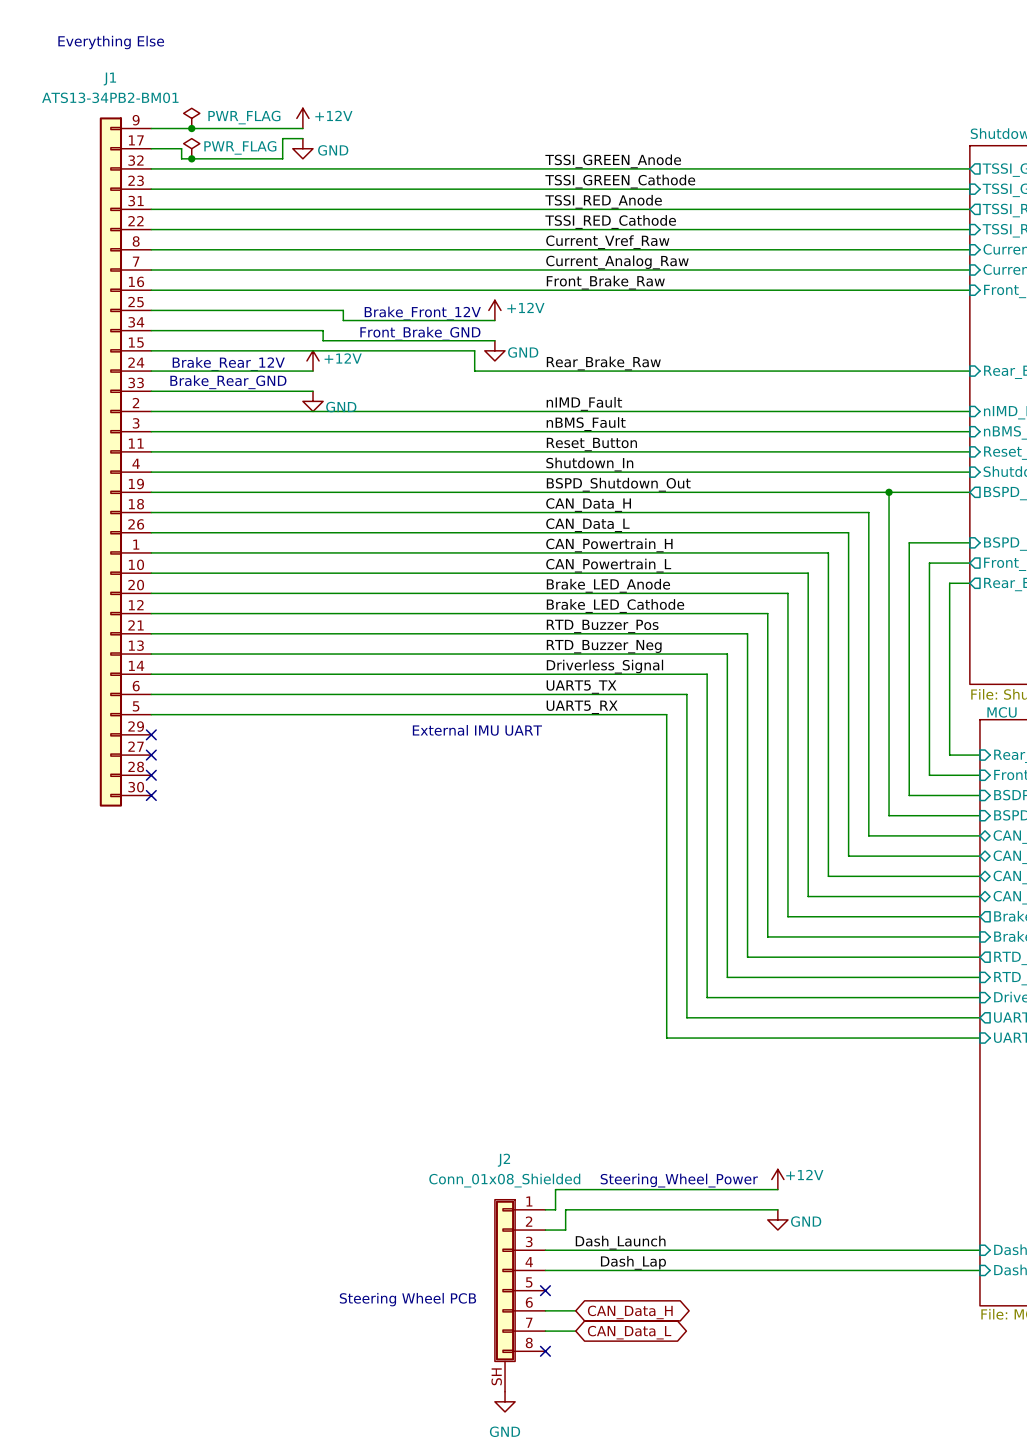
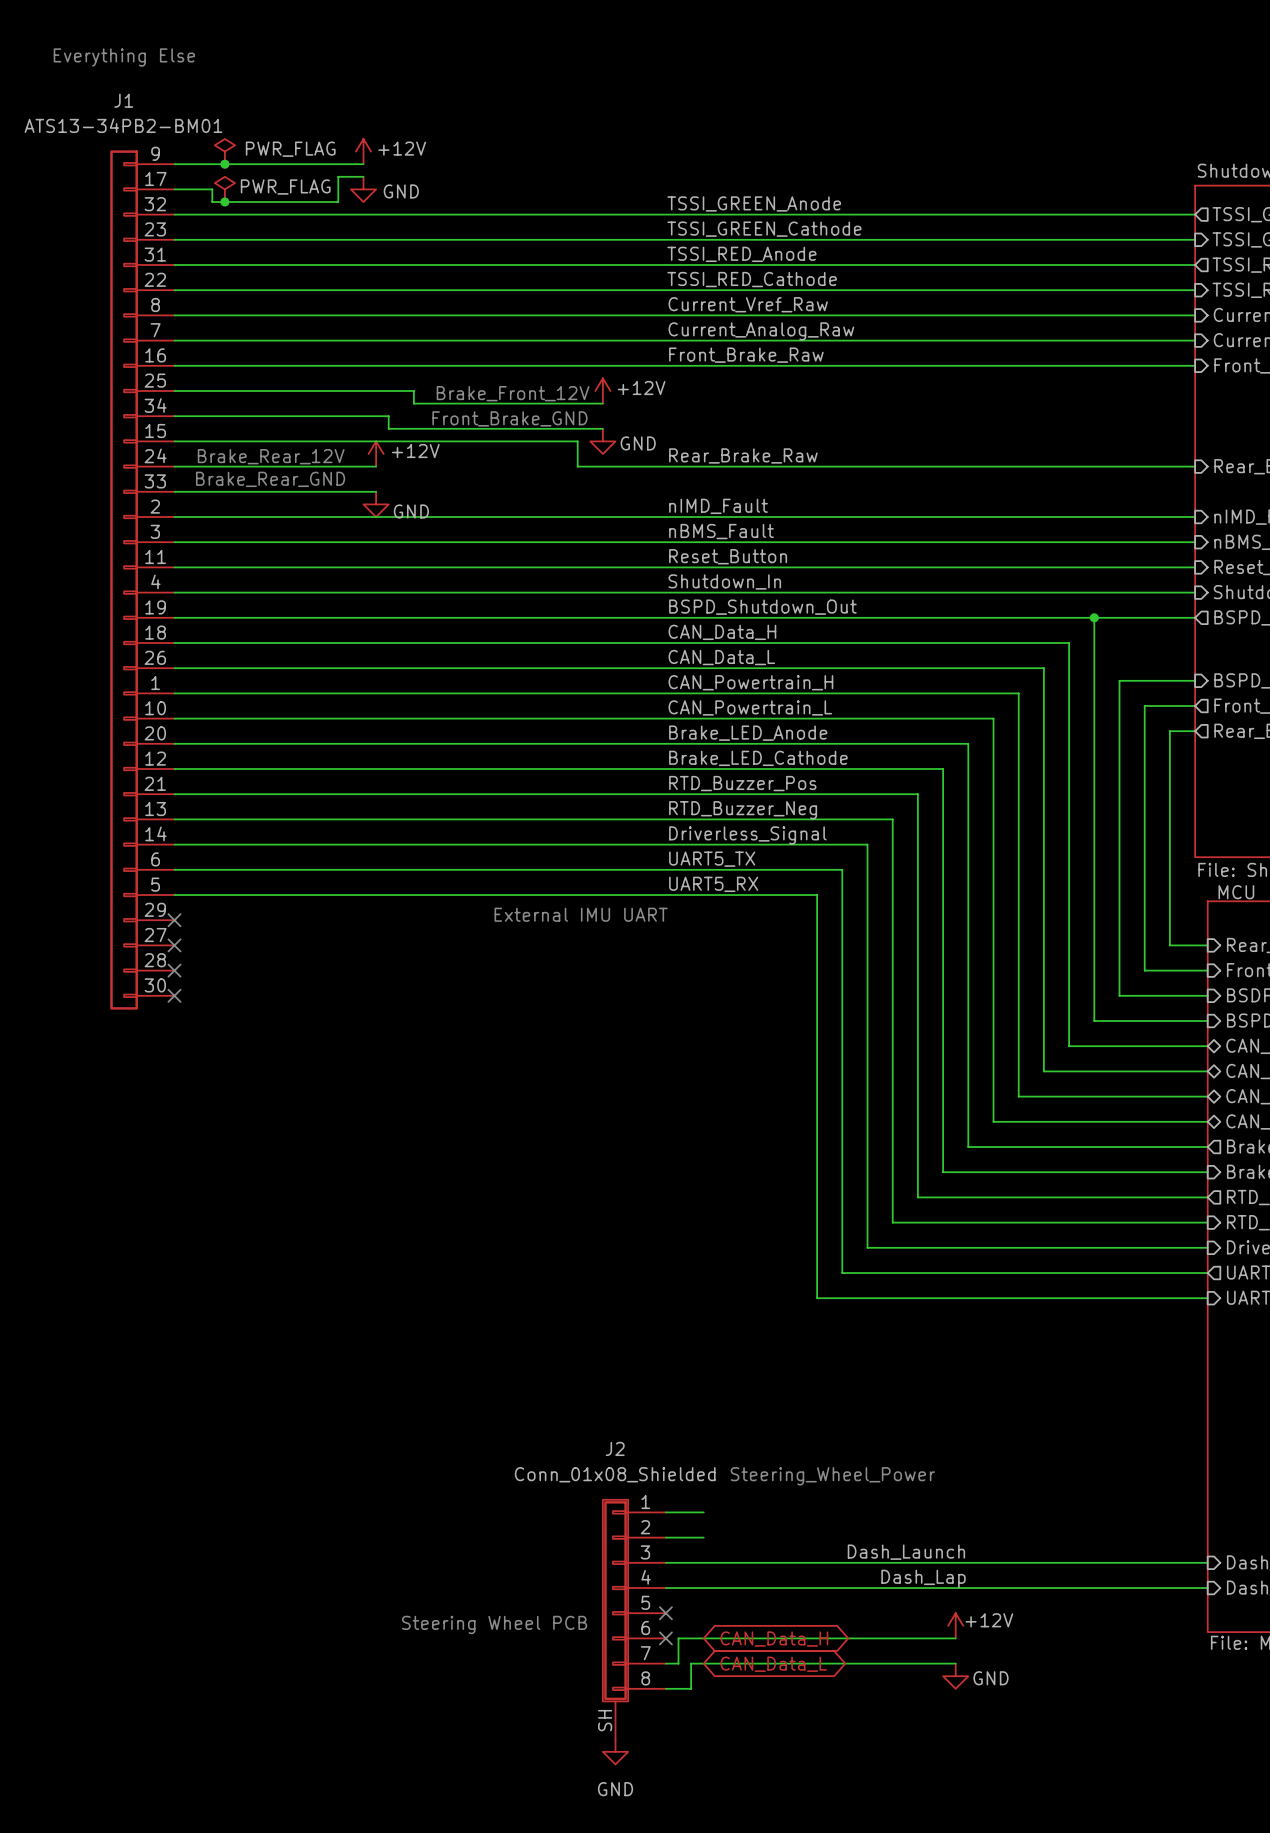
power symbol position: +12V (777, 1179) -> +12V (955, 1625)
wire: (777, 1189) (555, 1189) (555, 1209) -> (691, 1512) (678, 1512)
wire: (565, 1209) (565, 1230) -> (703, 1537) (691, 1537)
wire: (575, 1209) (777, 1209) -> (703, 1638) (955, 1638)
power symbol position: GND (777, 1219) -> GND (955, 1676)
label position: Dash_Launch (620, 1242) -> Dash_Launch (906, 1552)
label position: Dash_Lap (633, 1262) -> Dash_Lap (923, 1578)
wire: (545, 1310) (555, 1310) -> (678, 1663) (678, 1638)
wire: (555, 1331) (565, 1331) -> (665, 1688) (691, 1688) (691, 1663)
wire: none -> (703, 1663) (955, 1663)
no-connect mark position: (545, 1351) -> (665, 1638)

